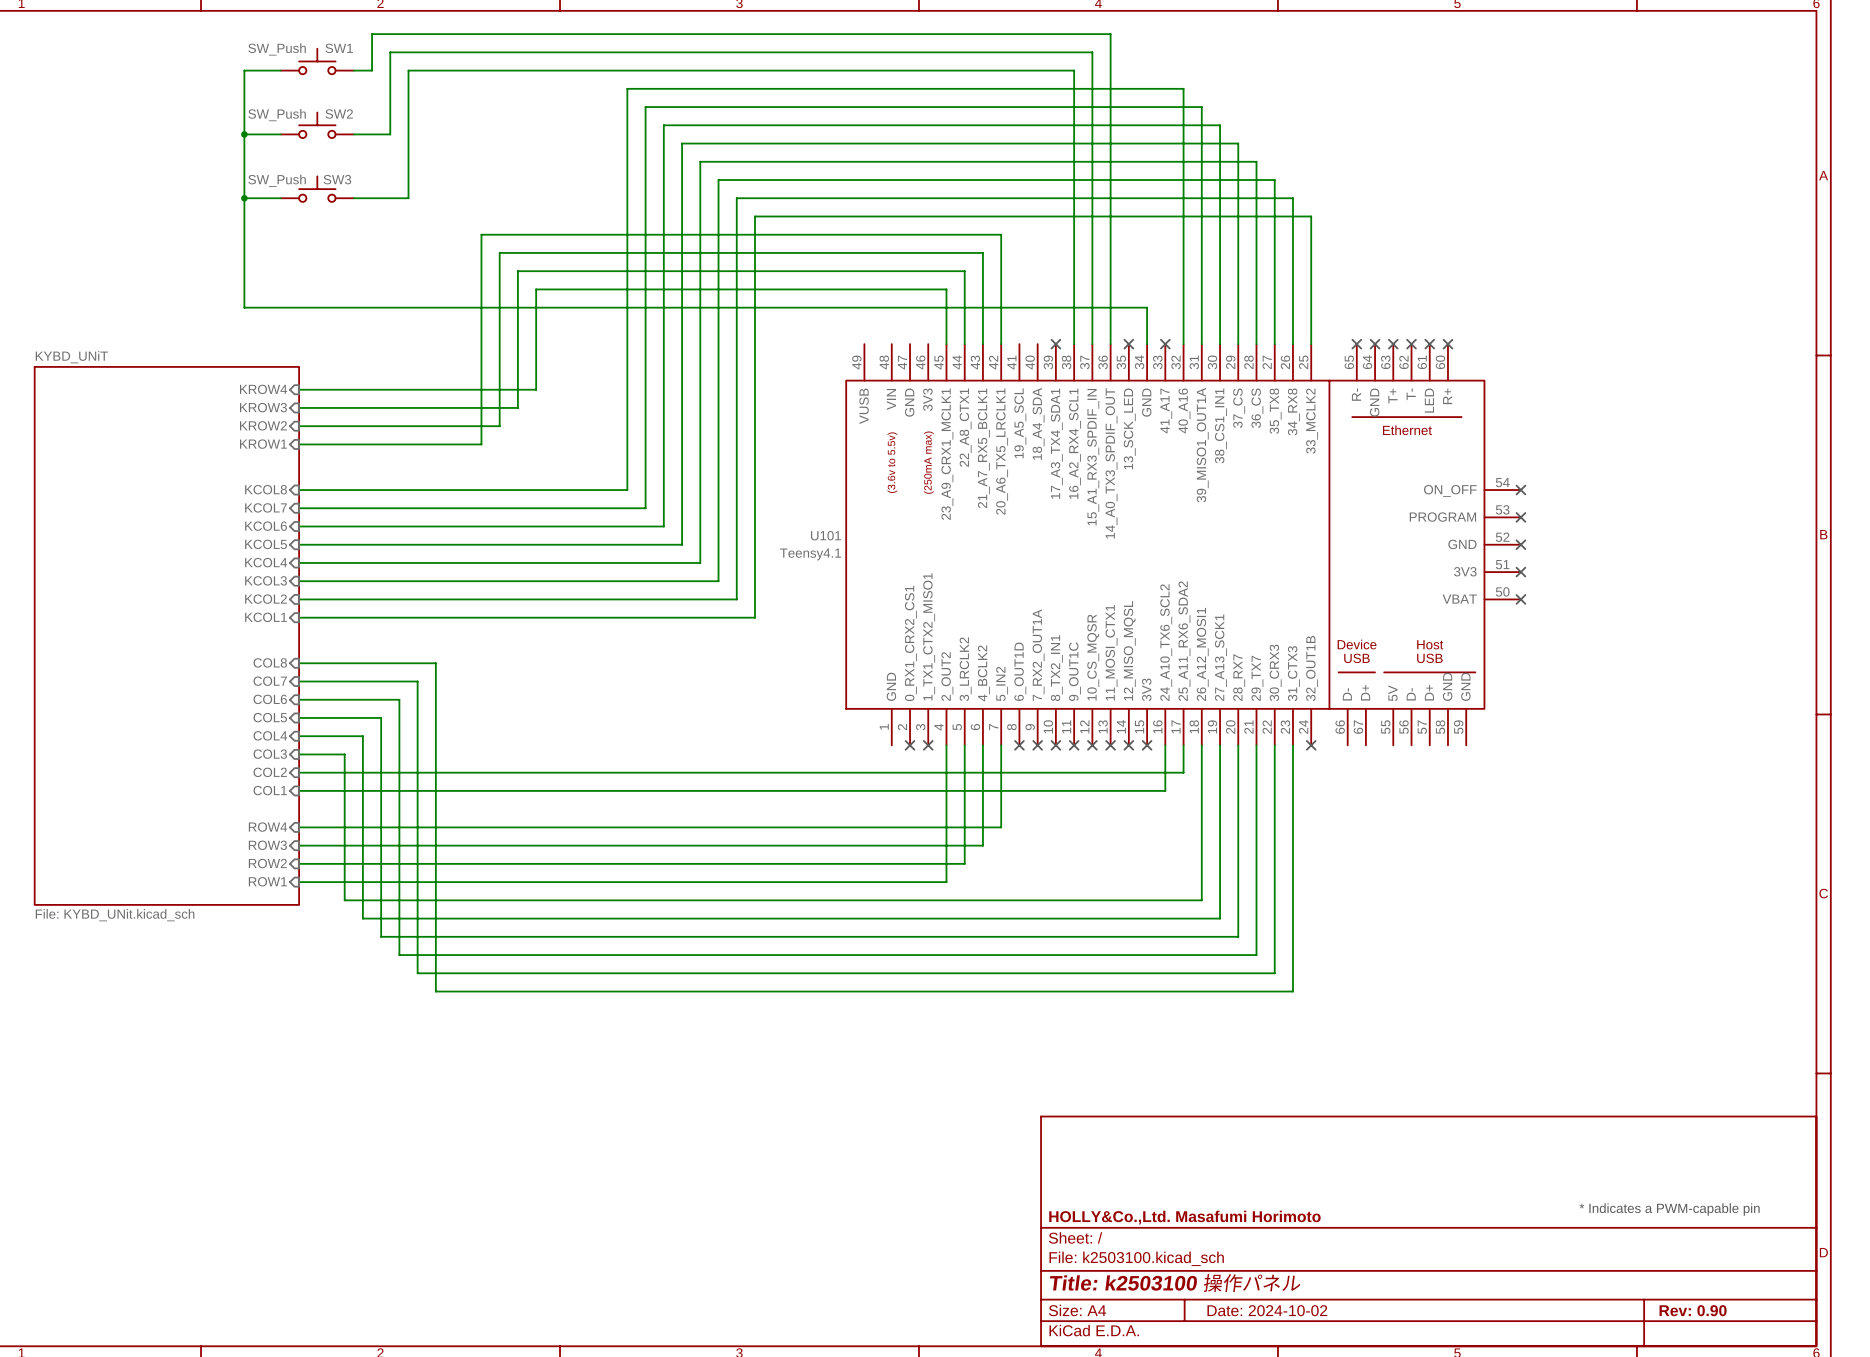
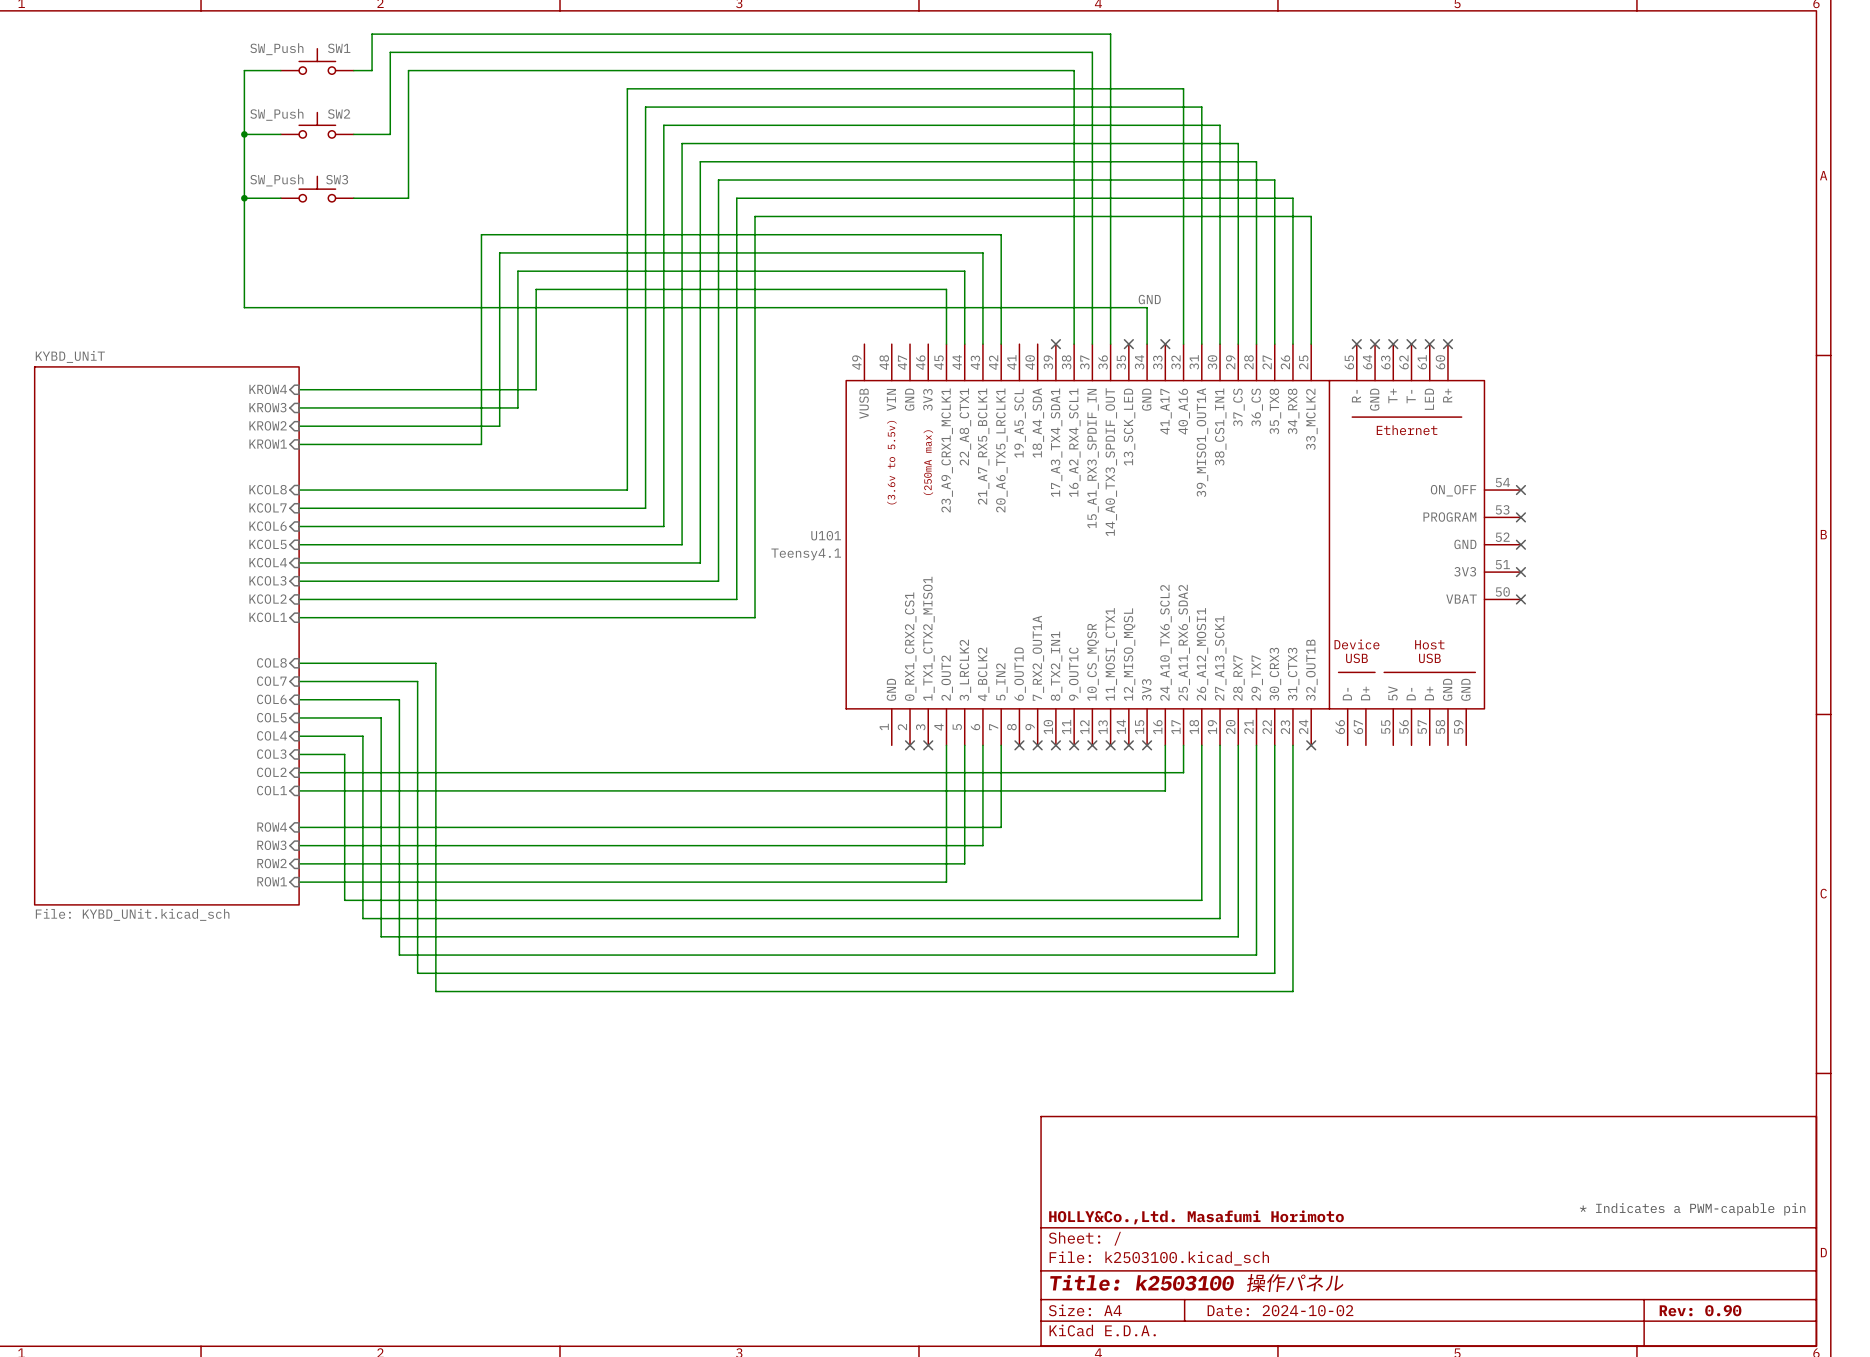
label: none -> GND (1149, 299)

